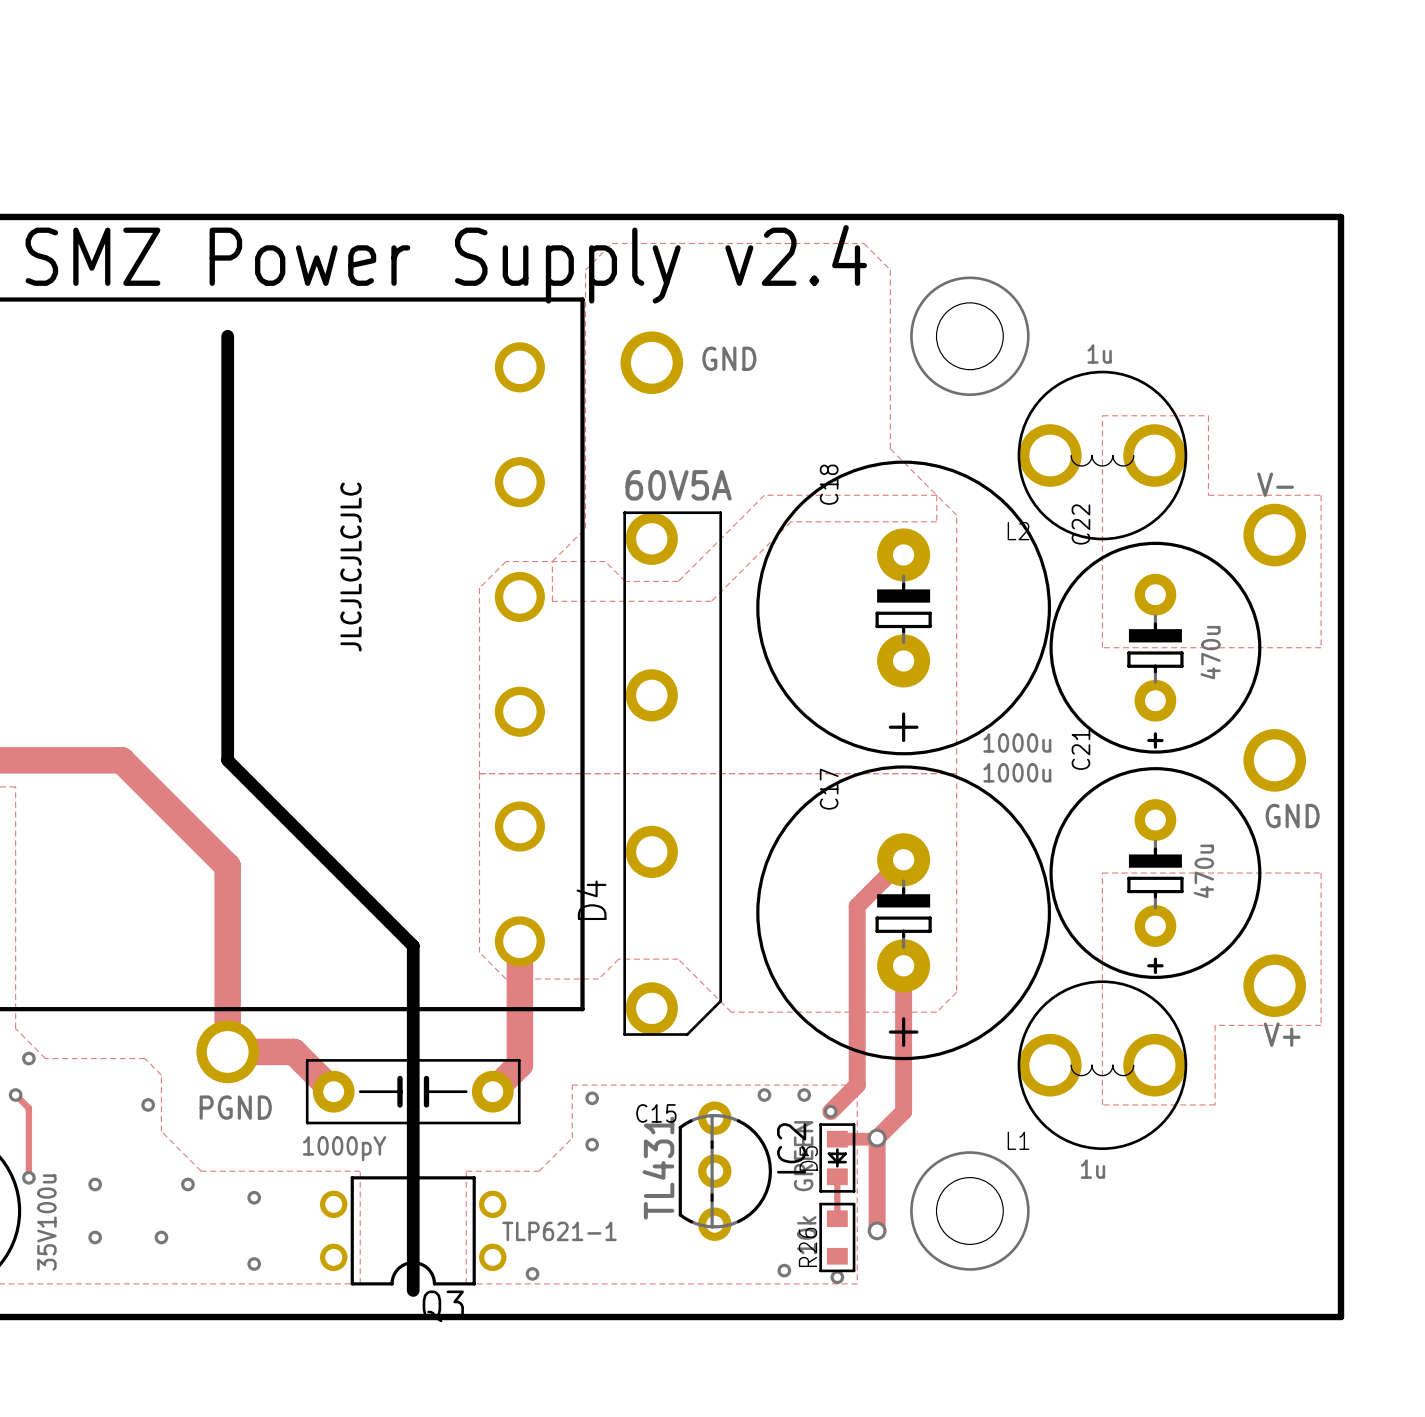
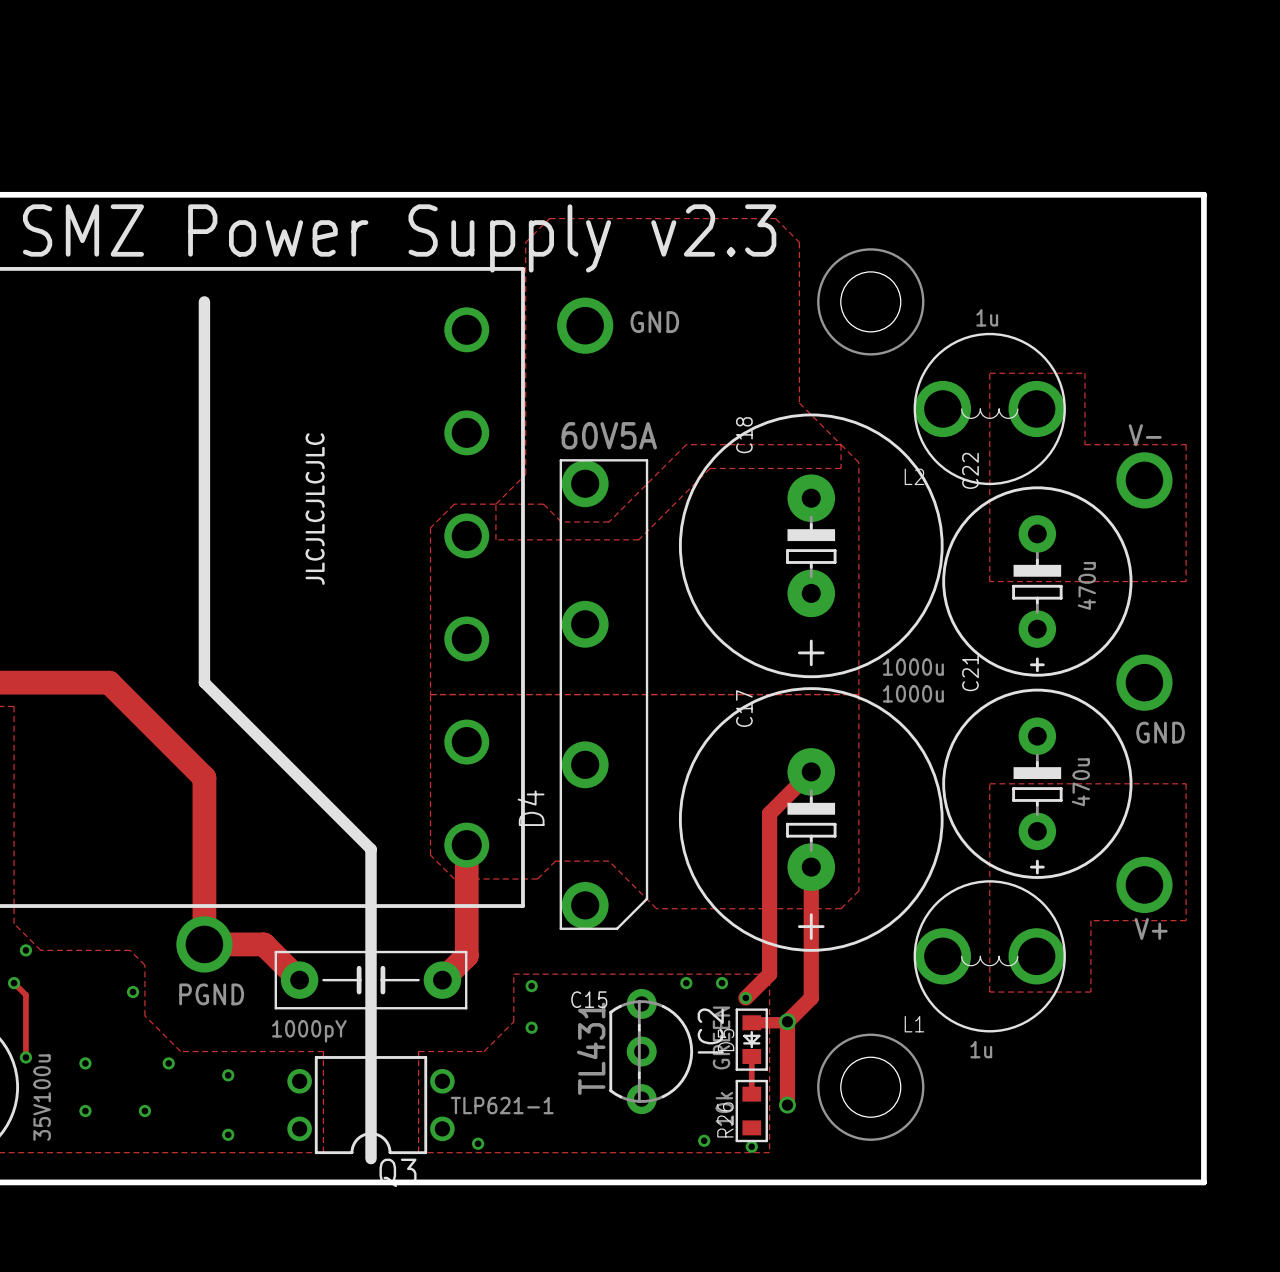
text: SMZ Power Supply v2.4 (446, 264) -> SMZ Power Supply v2.3 (399, 238)

